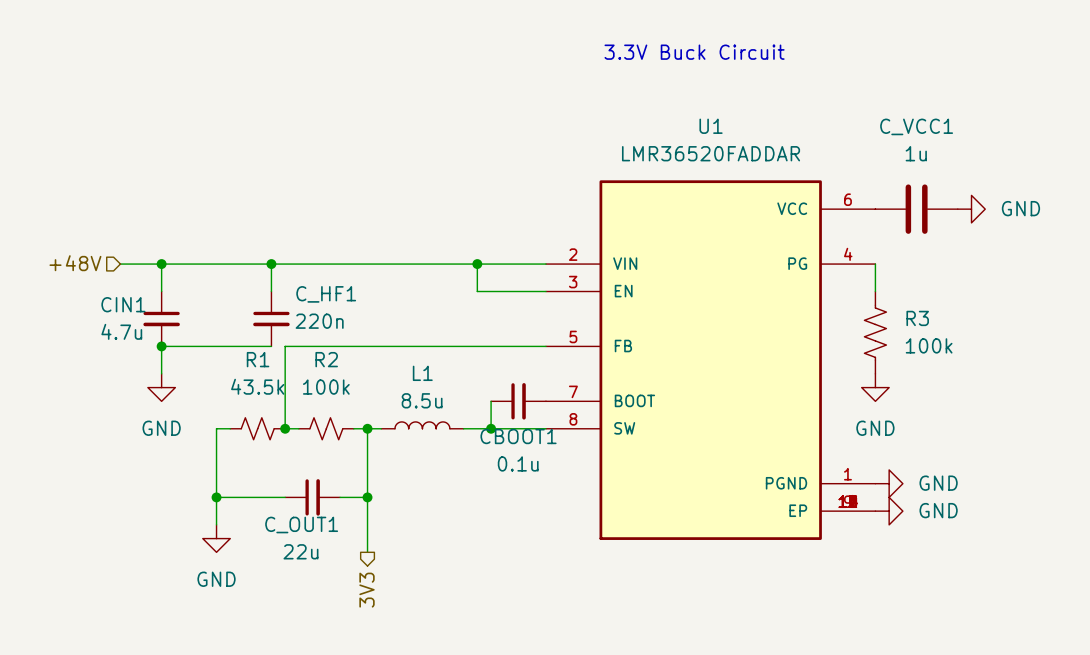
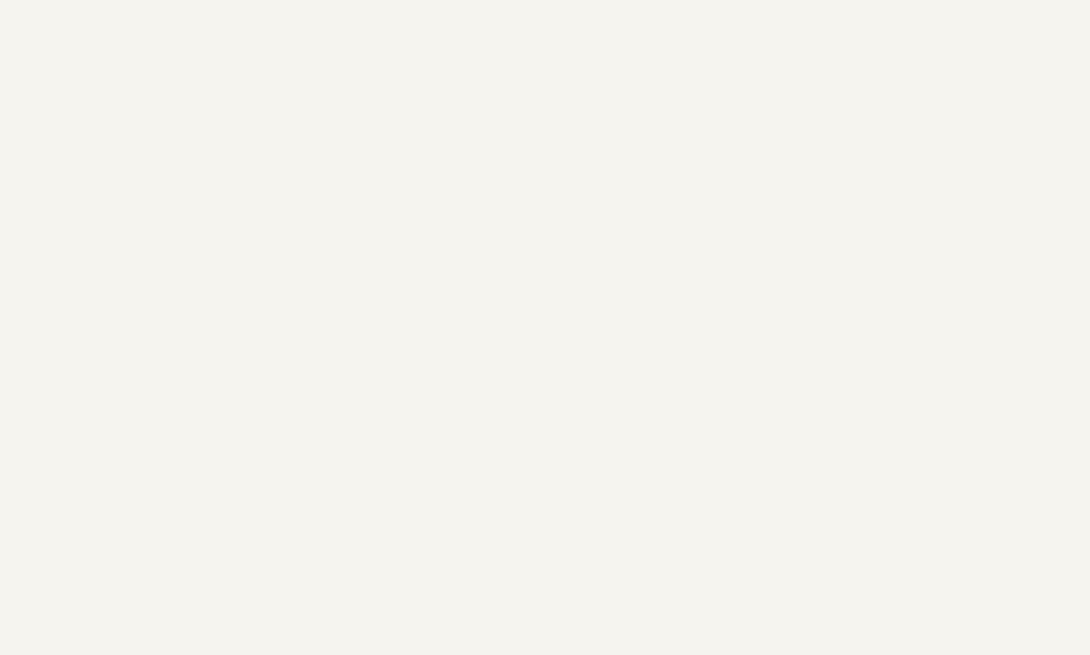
text: 3.3V Buck Circuit (694, 52) -> none
C_VCC1: 1u (916, 209) -> none
power symbol: GND (971, 209) -> none
hierarchical label: +48V (75, 263) -> none
wire: (120, 264) (545, 264) -> none
wire: (161, 264) (161, 291) -> none
junction: (161, 264) -> none
wire: (271, 264) (271, 291) -> none
junction: (271, 264) -> none
wire: (477, 264) (477, 291) (545, 291) -> none
junction: (477, 264) -> none
wire: (875, 264) (875, 291) -> none
CIN1: 4.7u (161, 318) -> none
C_HF1: 220n (271, 318) -> none
R3: 100k (875, 332) -> none
junction: (161, 346) -> none
wire: (271, 346) (161, 346) (161, 373) -> none
wire: (545, 346) (285, 346) (285, 428) (298, 428) -> none
U1: LMR36520FADDAR (710, 360) -> none
power symbol: GND (161, 387) -> none
power symbol: GND (875, 387) -> none
wire: (491, 401) (491, 428) -> none
CBOOT1: 0.1u (518, 401) -> none
L1: 8.5u (422, 425) -> none
wire: (230, 428) (216, 428) (216, 524) -> none
R1: 43.5k (257, 428) -> none
junction: (285, 428) -> none
R2: 100k (326, 428) -> none
wire: (353, 428) (381, 428) -> none
wire: (367, 428) (367, 552) -> none
junction: (367, 428) -> none
wire: (463, 428) (545, 428) -> none
junction: (491, 428) -> none
power symbol: GND (889, 483) -> none
wire: (216, 497) (285, 497) -> none
junction: (216, 497) -> none
C_OUT1: 22u (312, 497) -> none
wire: (340, 497) (367, 497) -> none
junction: (367, 497) -> none
power symbol: GND (889, 511) -> none
power symbol: GND (216, 538) -> none
hierarchical label: 3V3 (367, 590) -> none

